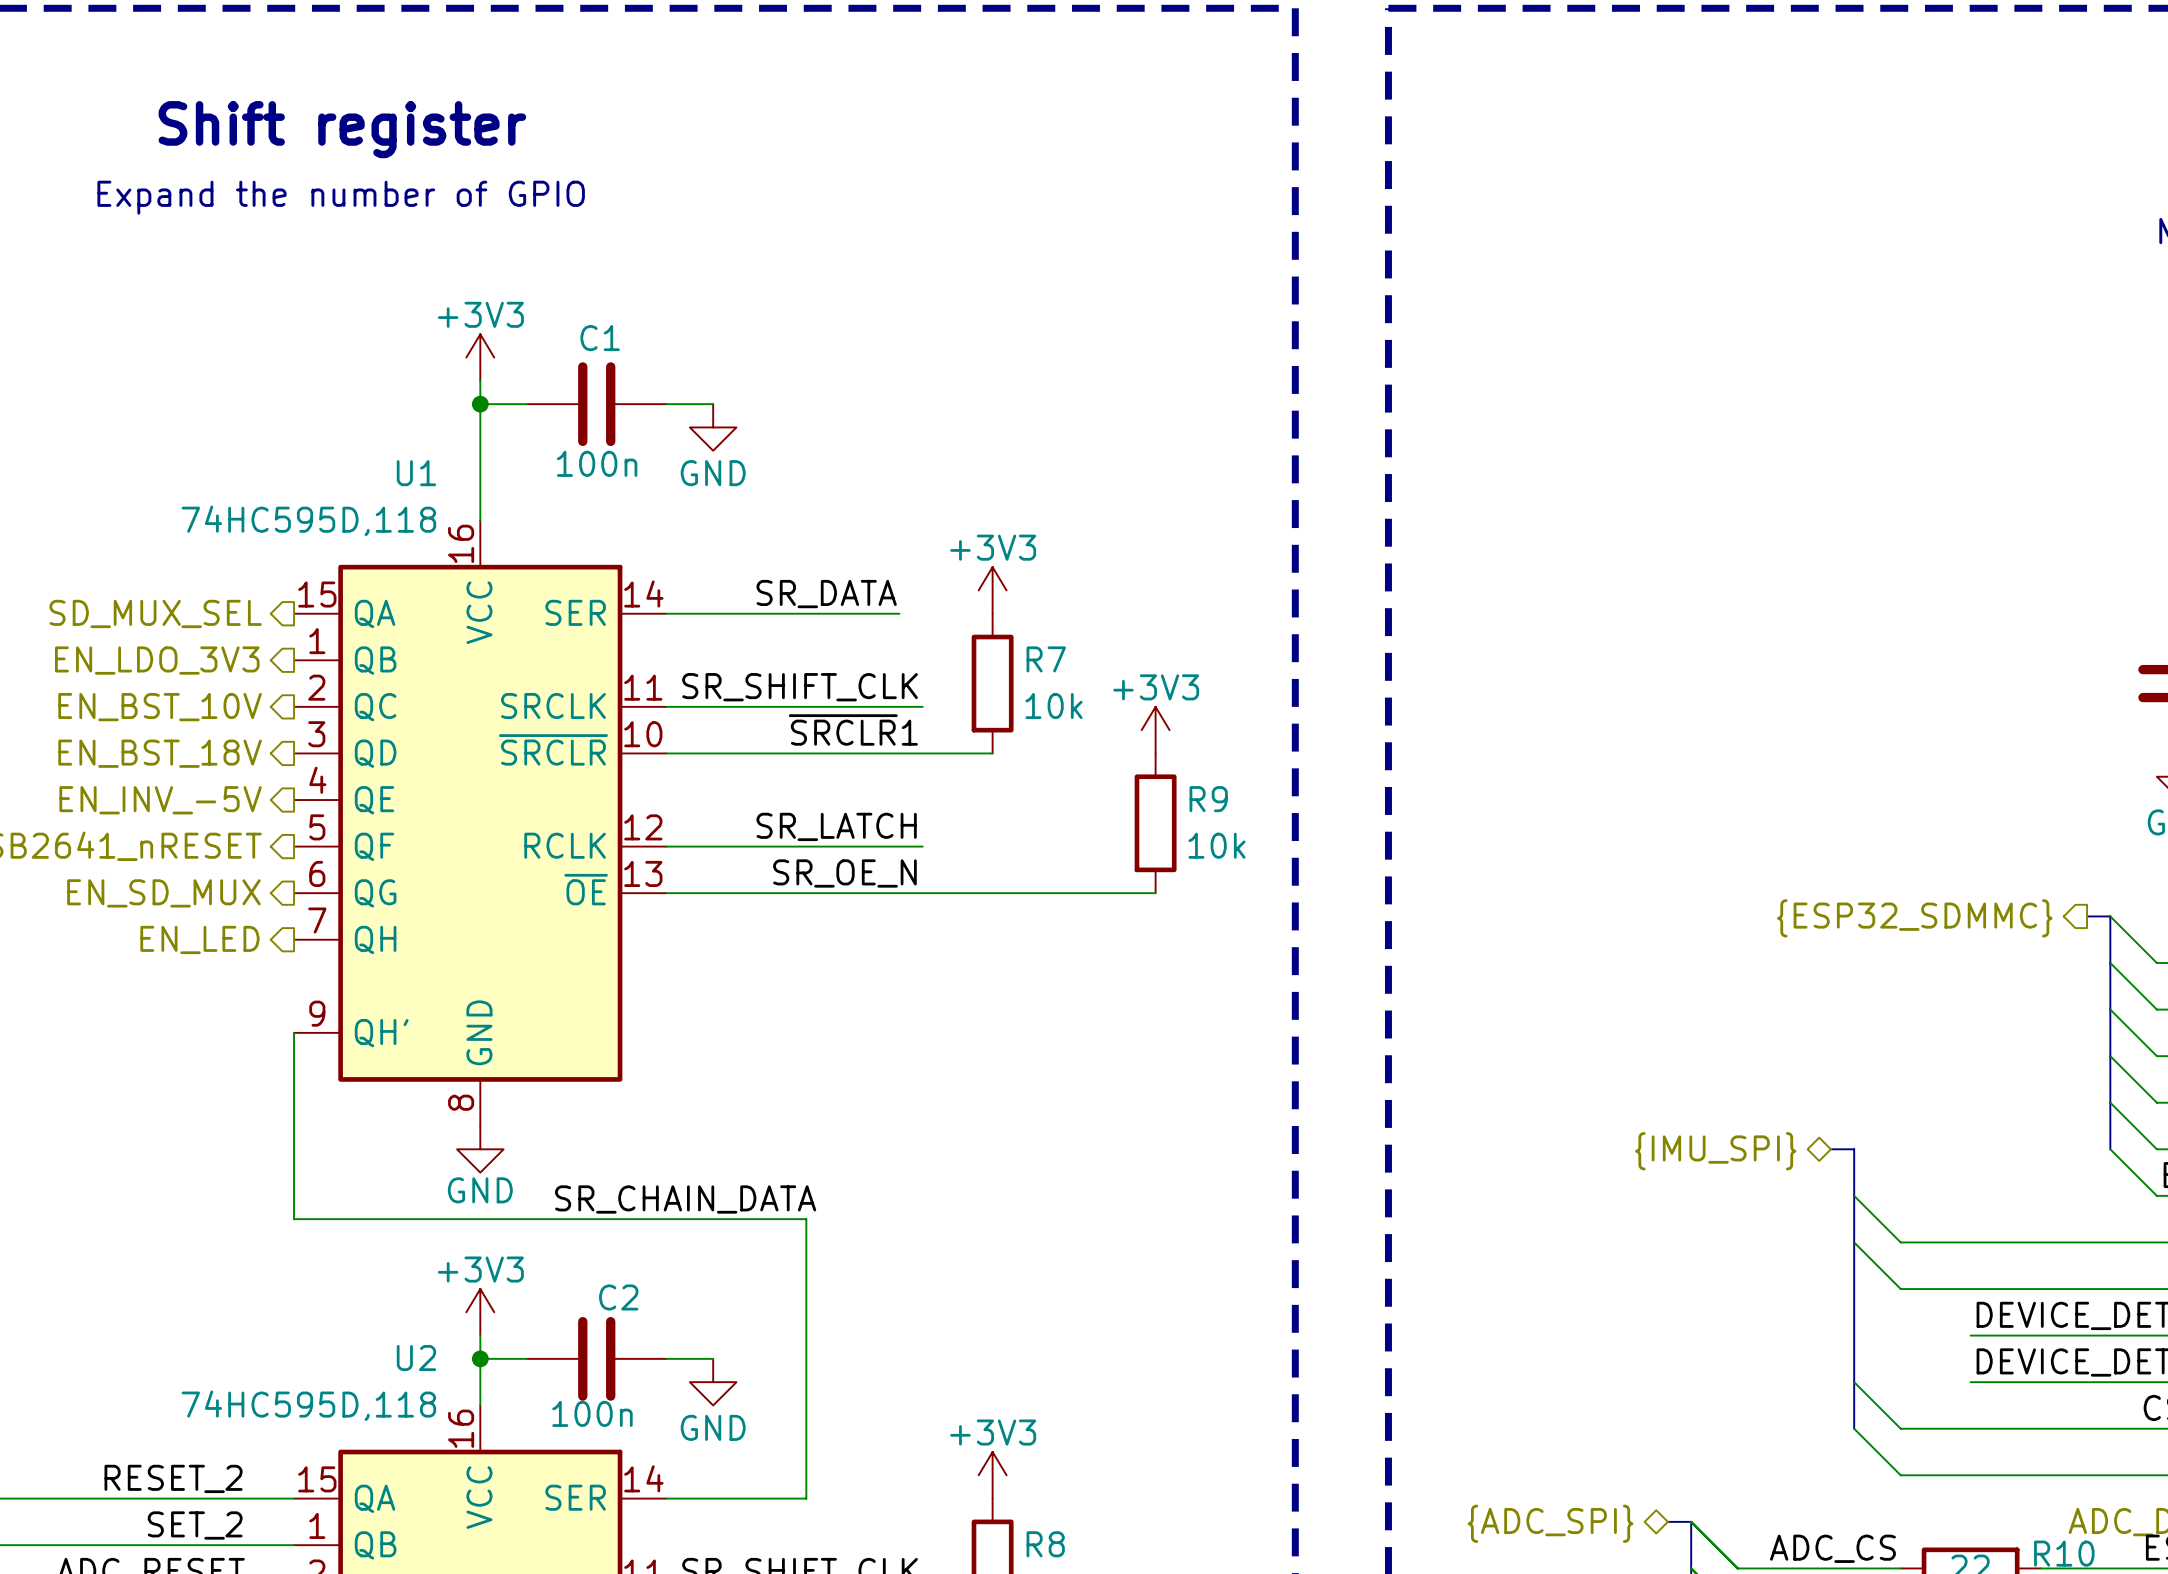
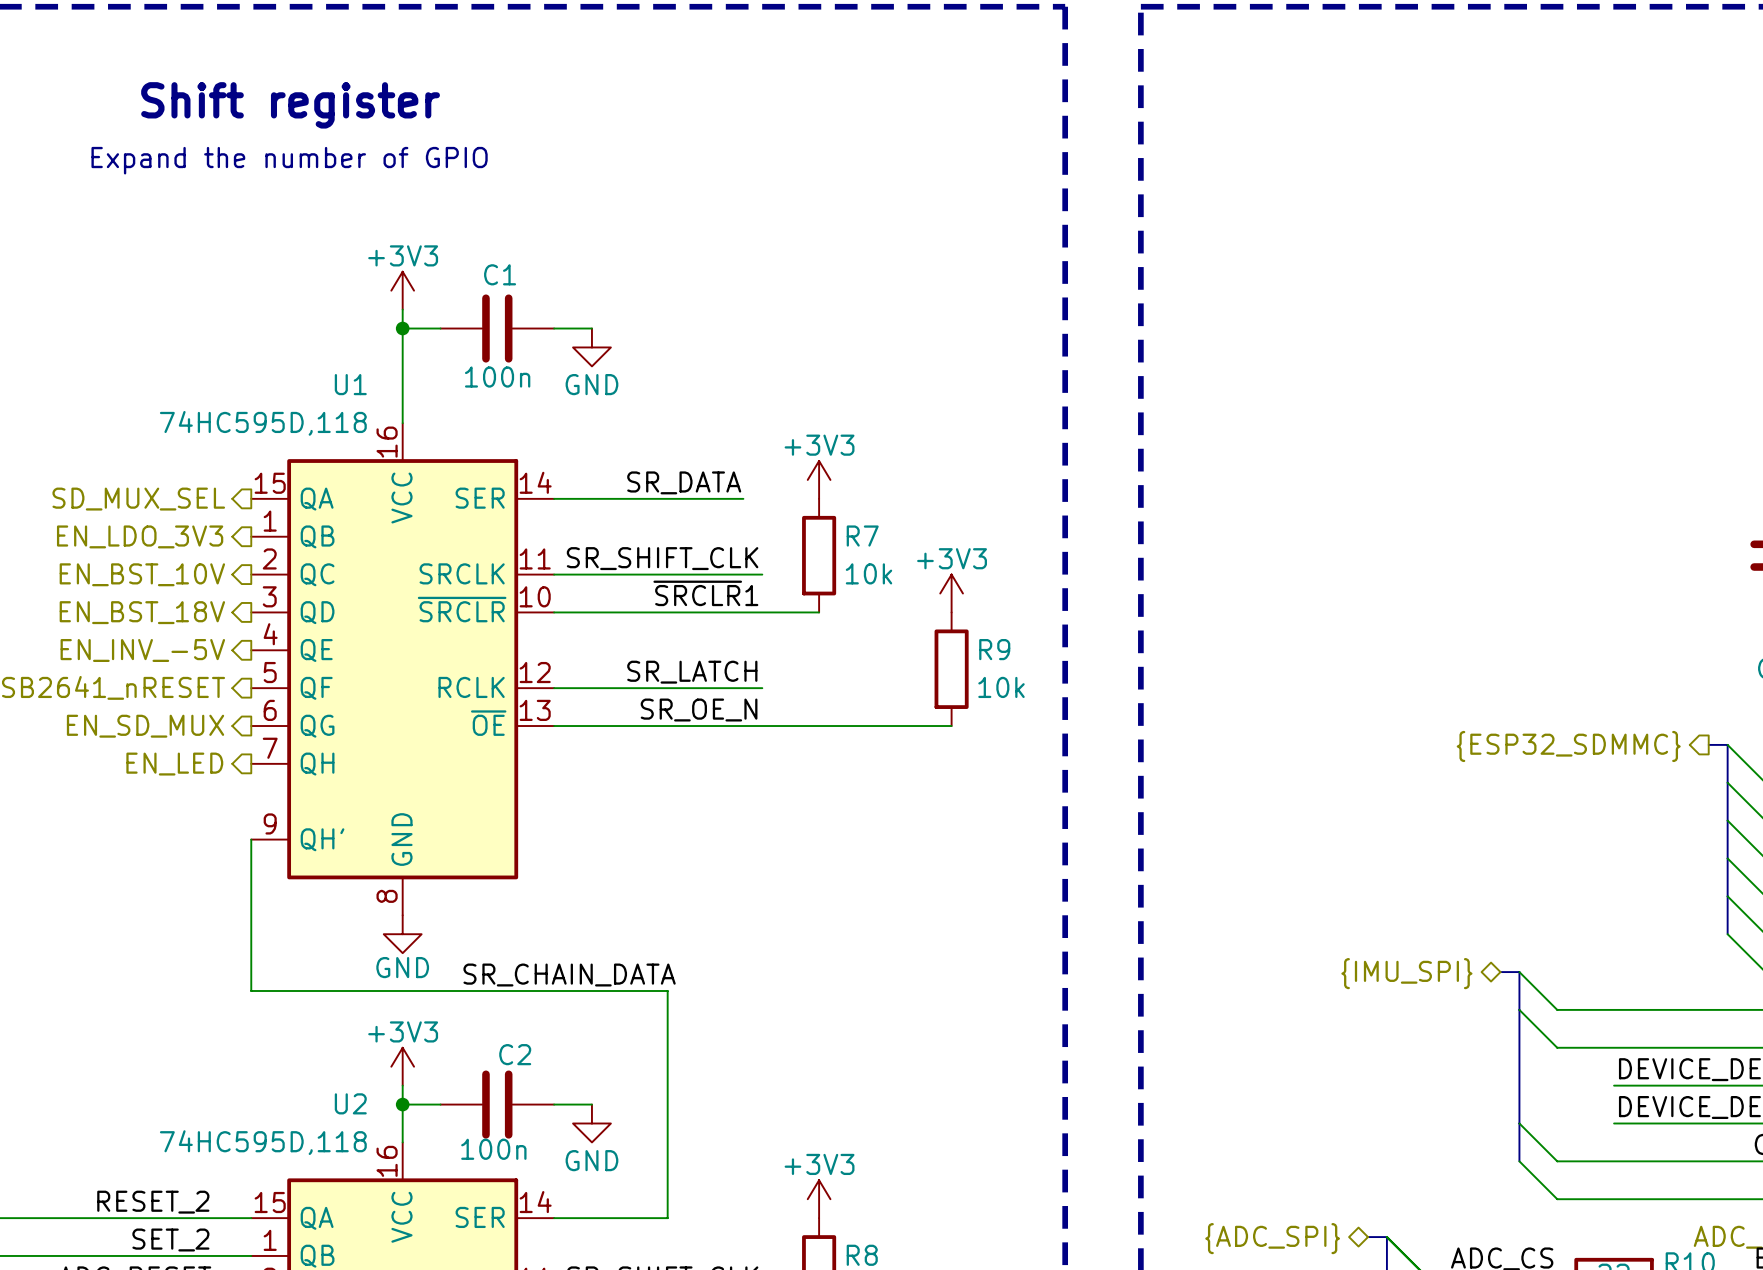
bus: (1830, 1149) (1854, 1149) (1854, 1195) -> (1500, 972) (1519, 972)
hierarchical label position: {IMU_SPI} (1715, 1151) -> {IMU_SPI} (1406, 973)

